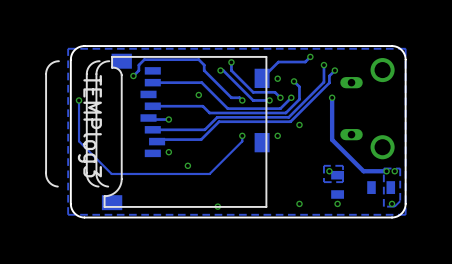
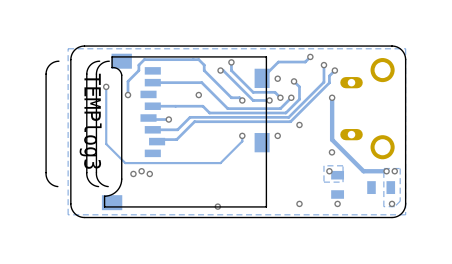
track: none -> (133, 75) (128, 81) (128, 95)
via: (133, 75) -> none
via: none -> (106, 86)
via: none -> (128, 95)
track: (79, 100) (79, 141) (111, 173) (209, 173) (220, 163) -> (106, 86) (106, 144) (125, 163) (220, 163)
via: (79, 100) -> none
track: (217, 117) (204, 129) (177, 129) -> (217, 117) (190, 117) (177, 129)
track: (219, 121) (201, 139) (176, 139) -> (219, 121) (194, 121) (176, 139)
via: (168, 152) -> none
via: none -> (331, 152)
via: (187, 165) -> none
via: none -> (141, 171)
via: none -> (133, 173)
via: none -> (149, 173)

